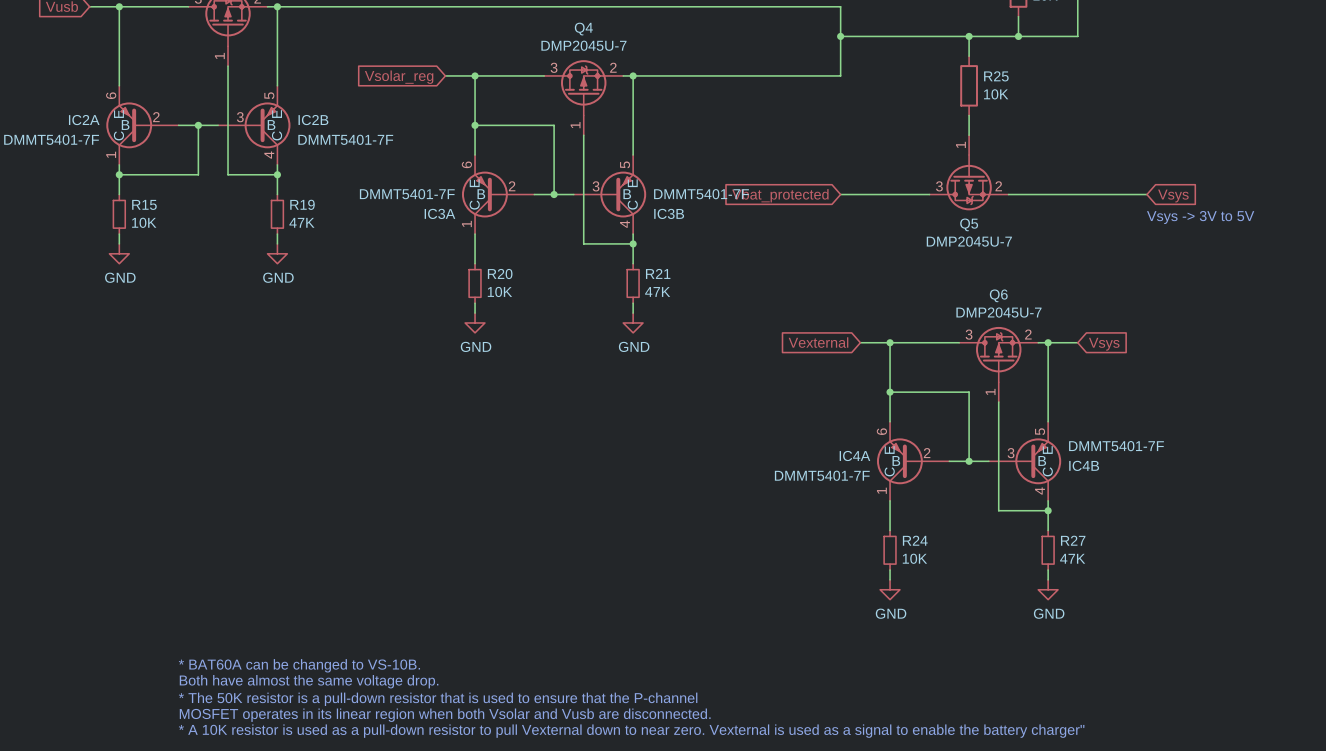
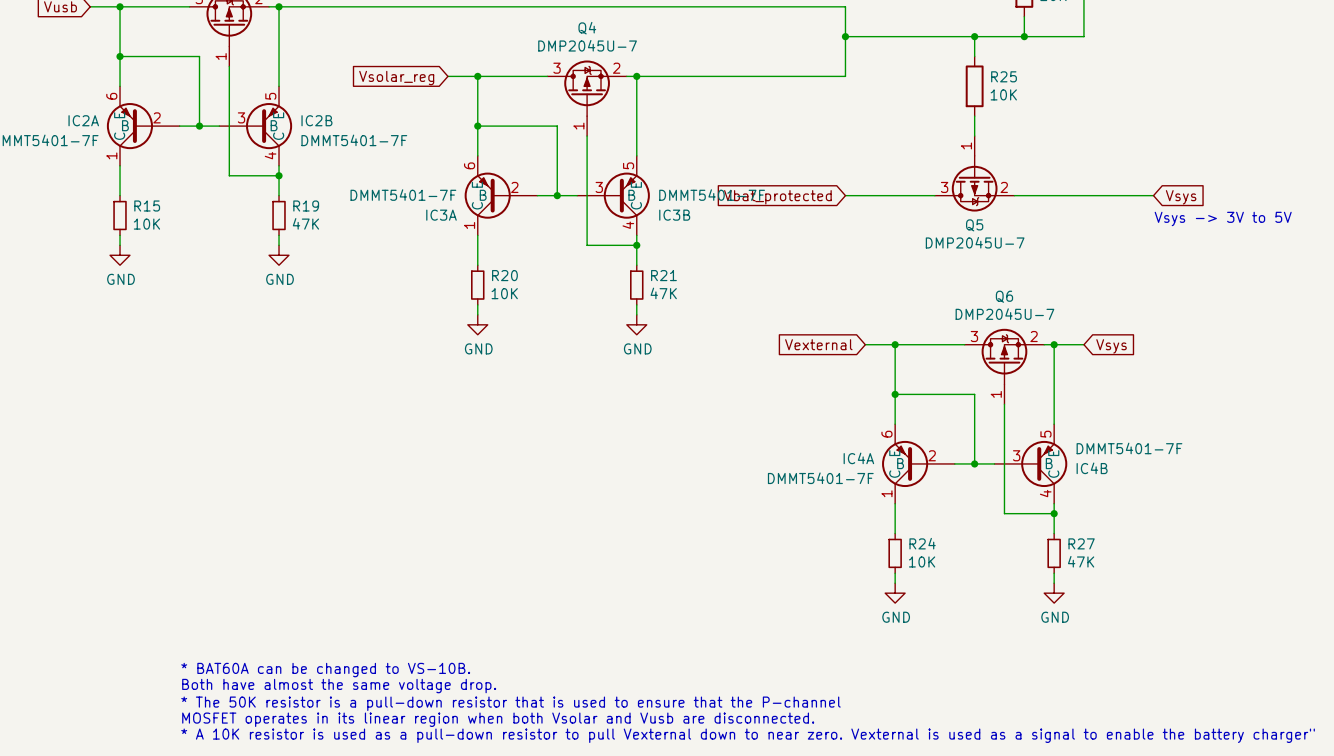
junction: none -> (120, 56)
wire: (198, 125) (198, 174) (119, 174) -> (199, 126) (199, 56) (120, 56)
junction: (119, 174) -> none

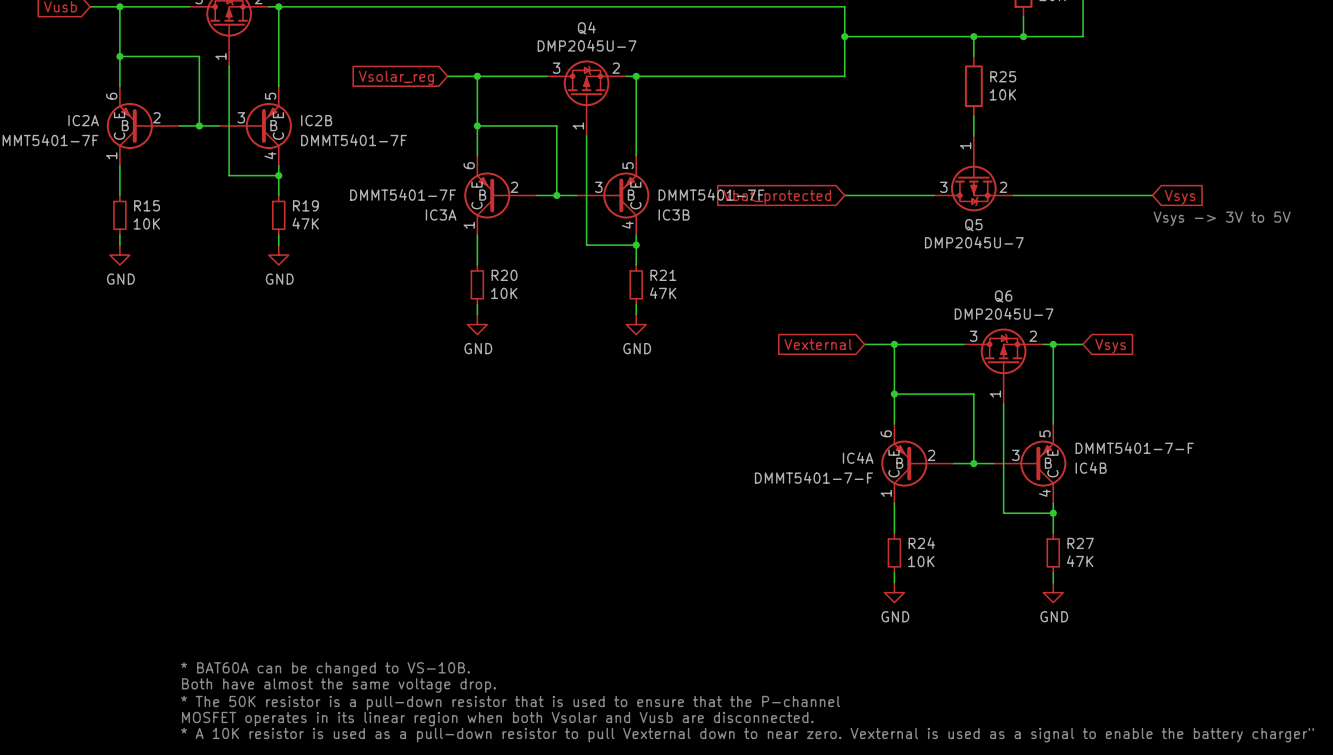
IC4B value: DMMT5401-7F (1129, 448) -> DMMT5401-7-F (1134, 448)
IC4A value: DMMT5401-7F (820, 478) -> DMMT5401-7-F (813, 477)

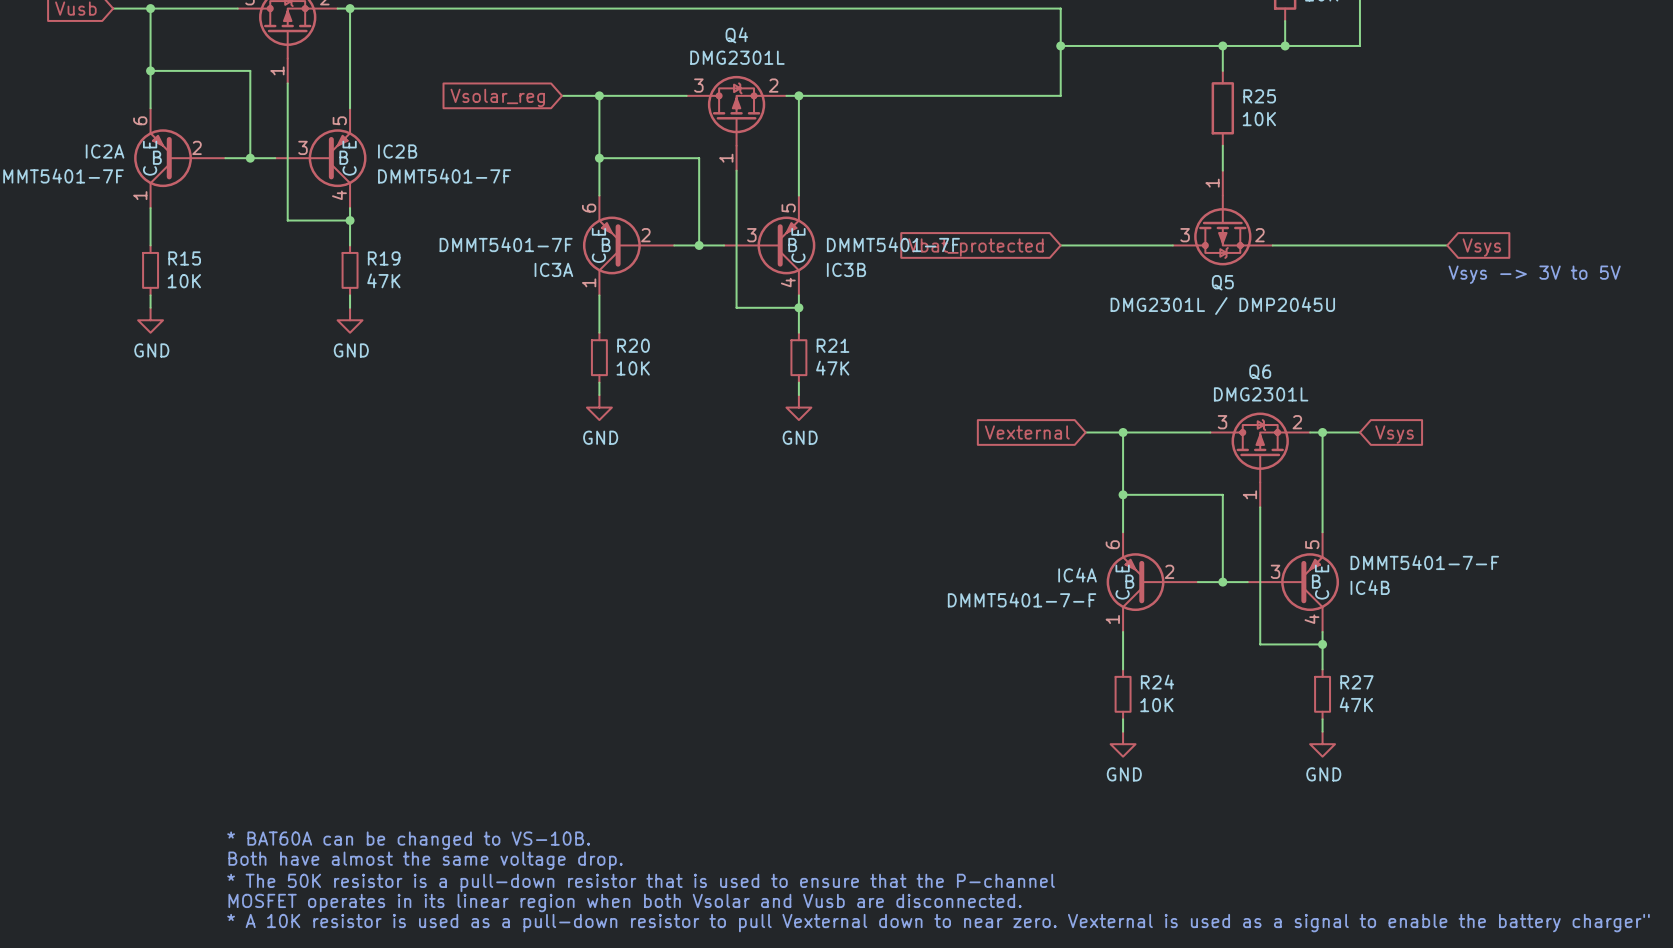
Q4 value: DMP2045U-7 (587, 45) -> DMG2301L (737, 57)
Q5 value: DMP2045U-7 (974, 242) -> DMG2301L / DMP2045U (1222, 306)
Q6 value: DMP2045U-7 (1004, 313) -> DMG2301L (1261, 394)

